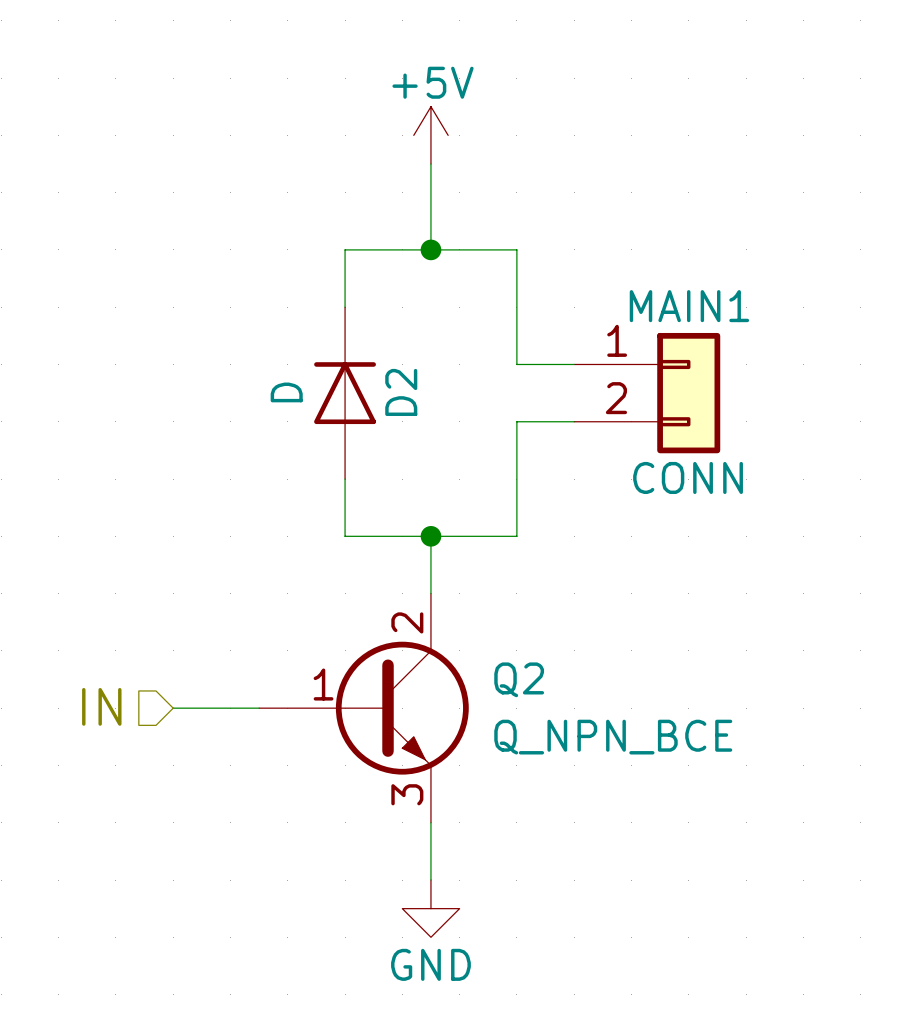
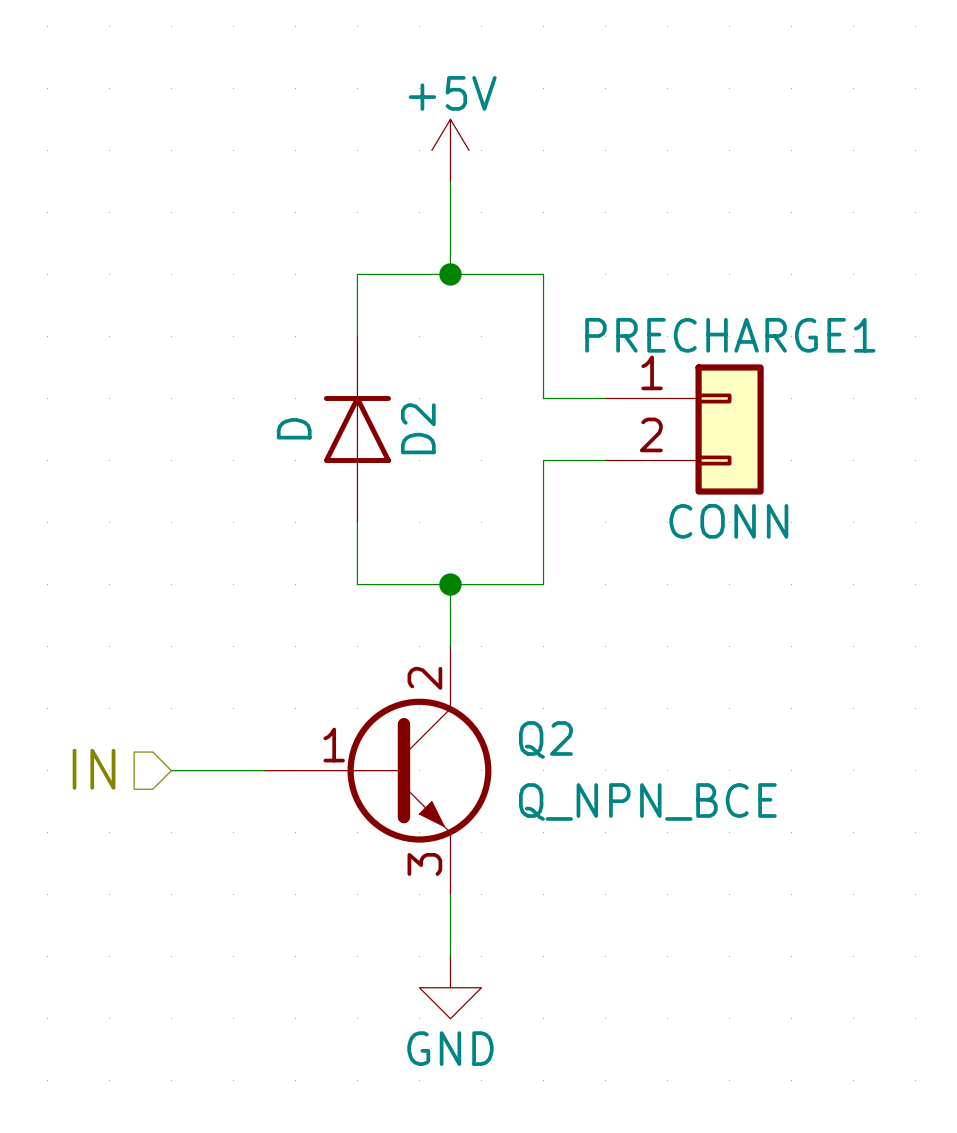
MAIN1 name: MAIN1 (689, 306) -> PRECHARGE1 (730, 335)

